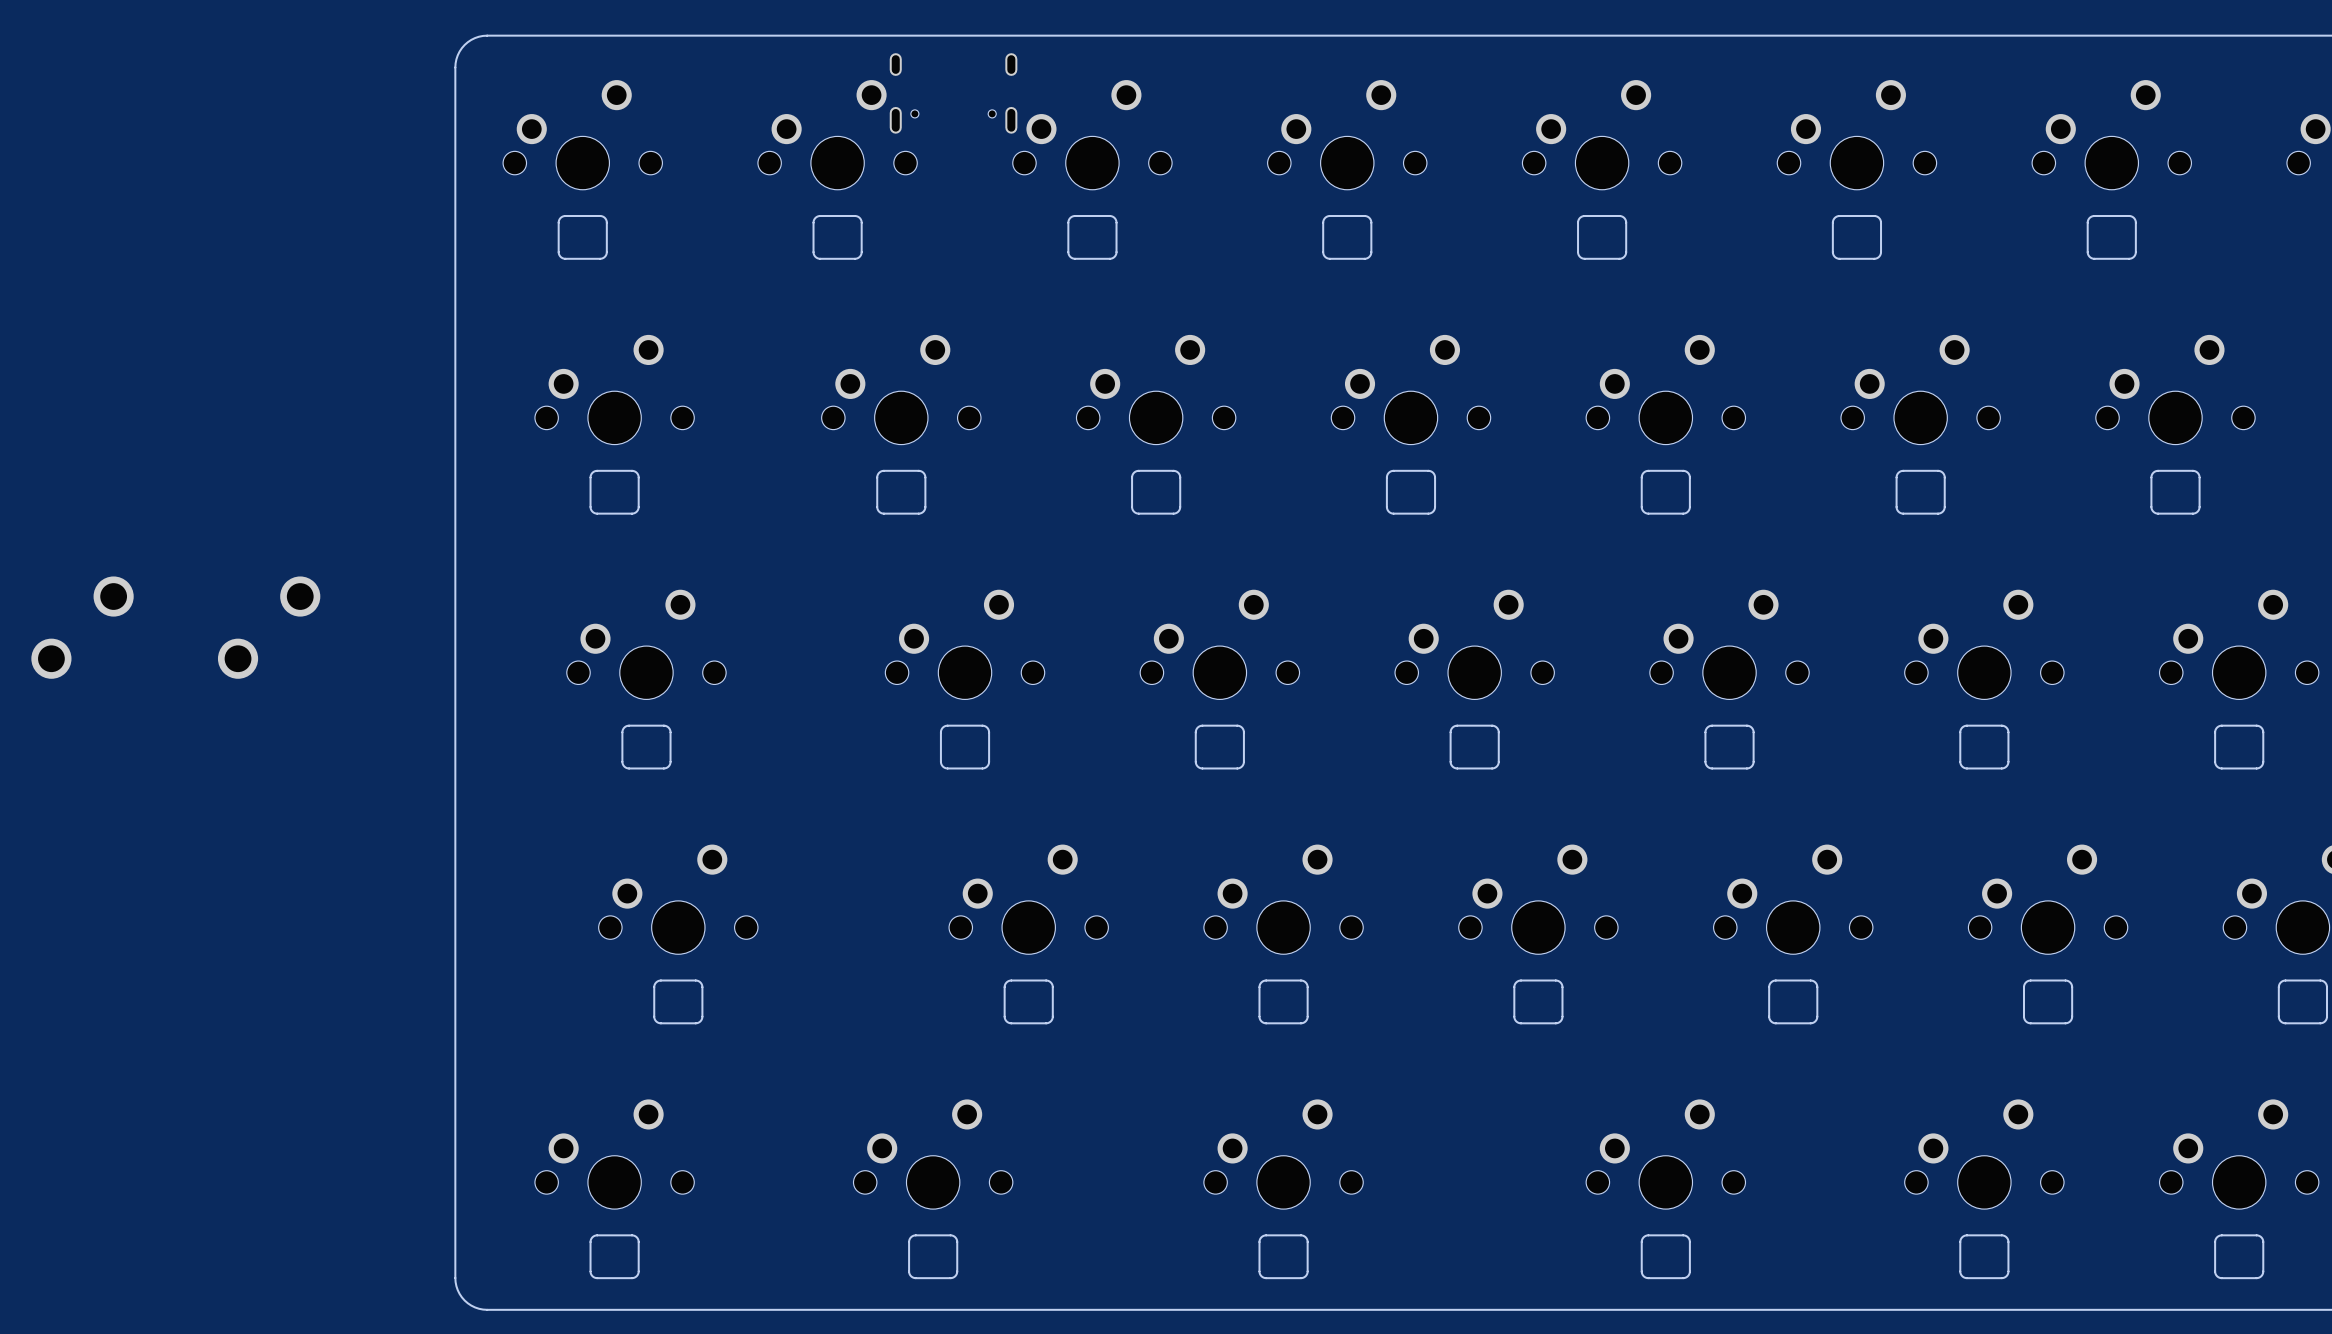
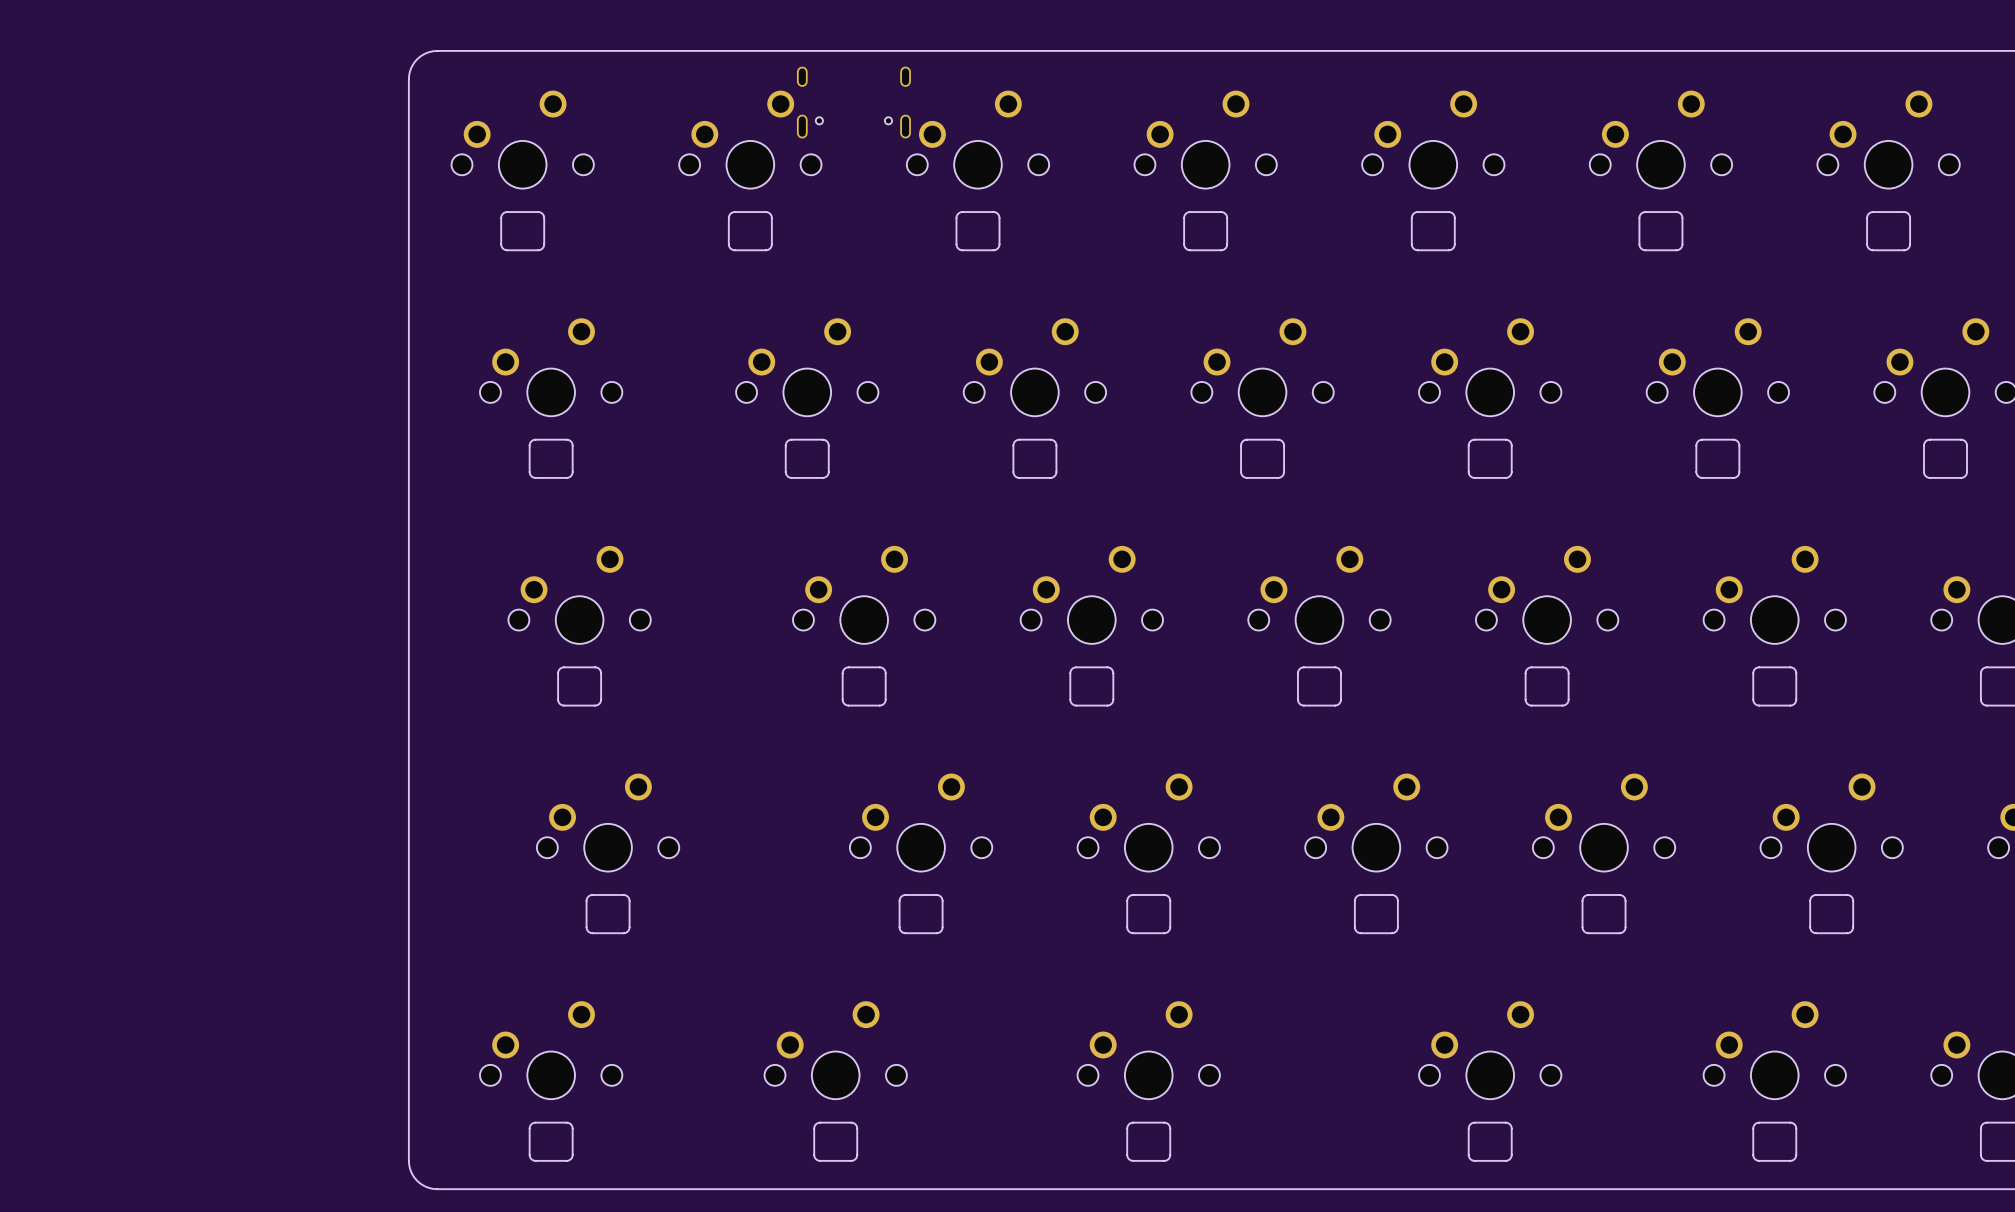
part: (113, 596) -> none
part: (300, 596) -> none
part: (51, 658) -> none
part: (238, 658) -> none

